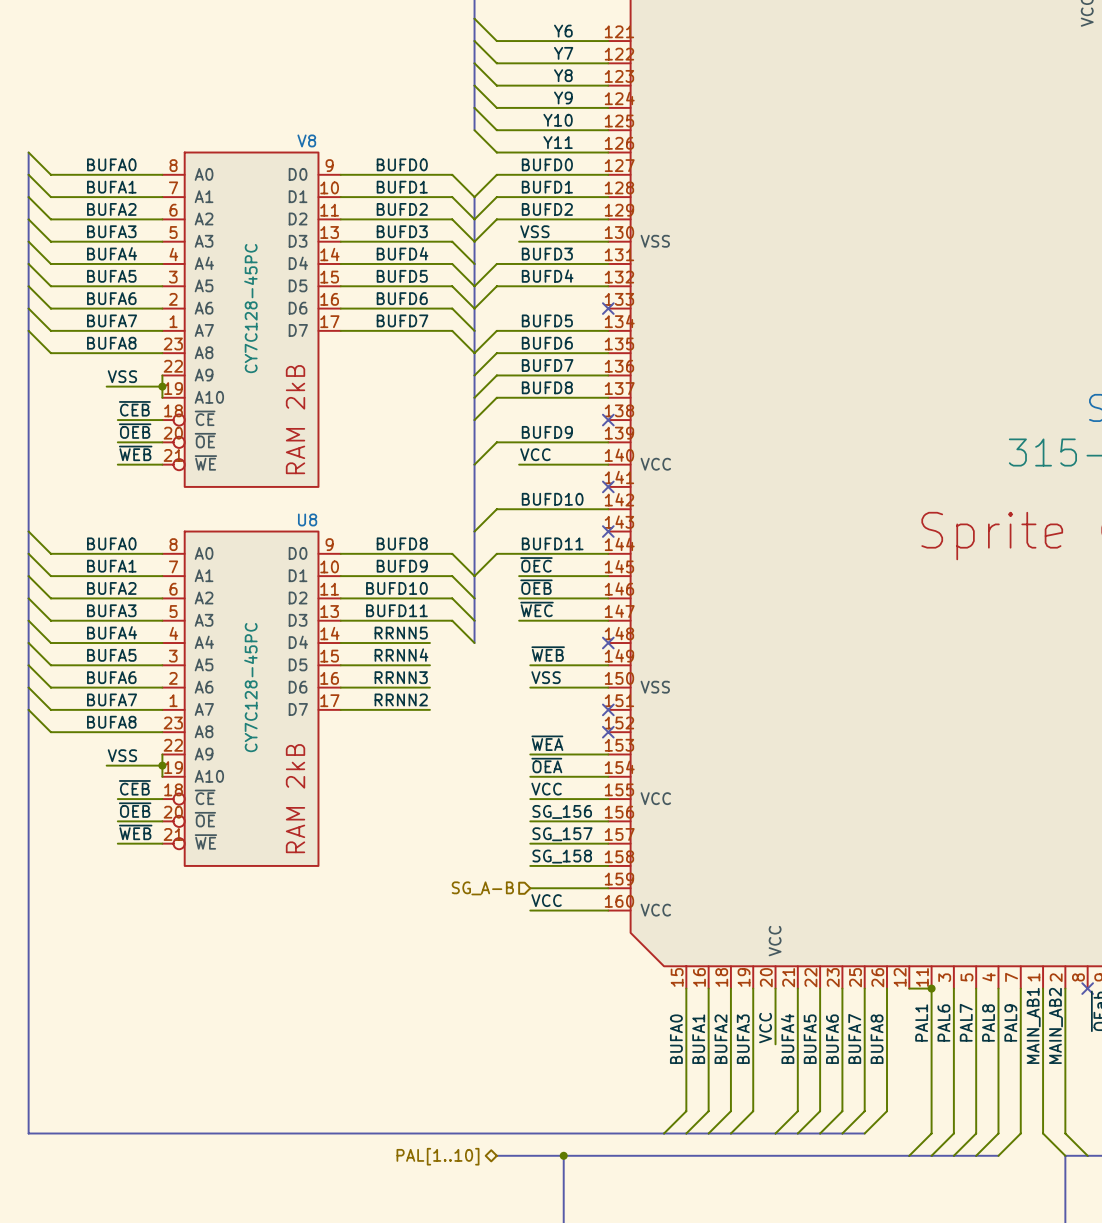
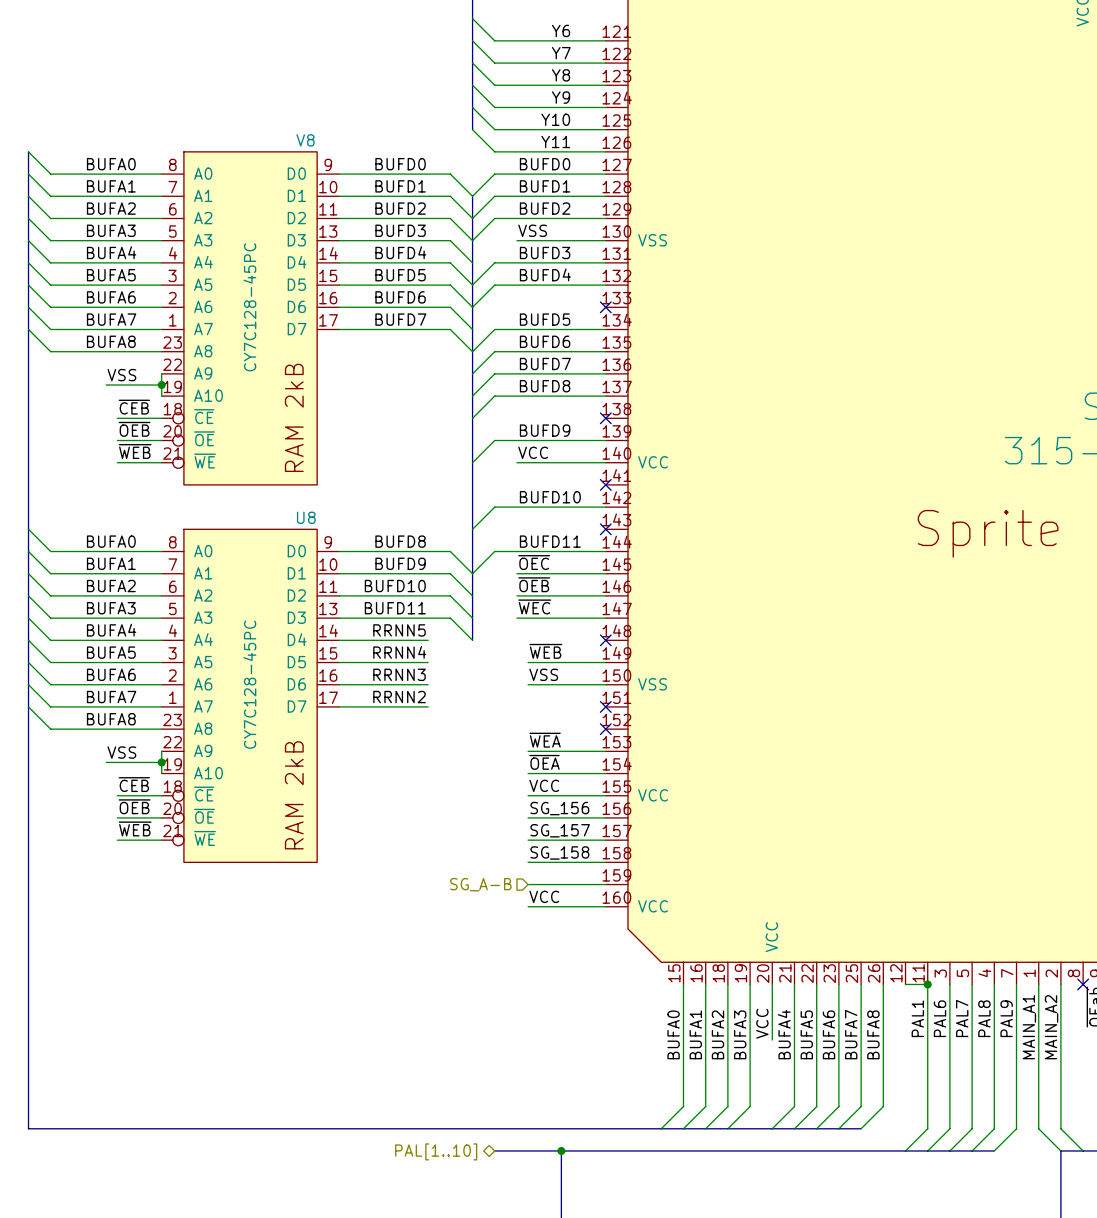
label: MAIN_AB1 (1033, 1025) -> MAIN_A1 (1029, 1027)
label: MAIN_AB2 (1055, 1025) -> MAIN_A2 (1051, 1027)

